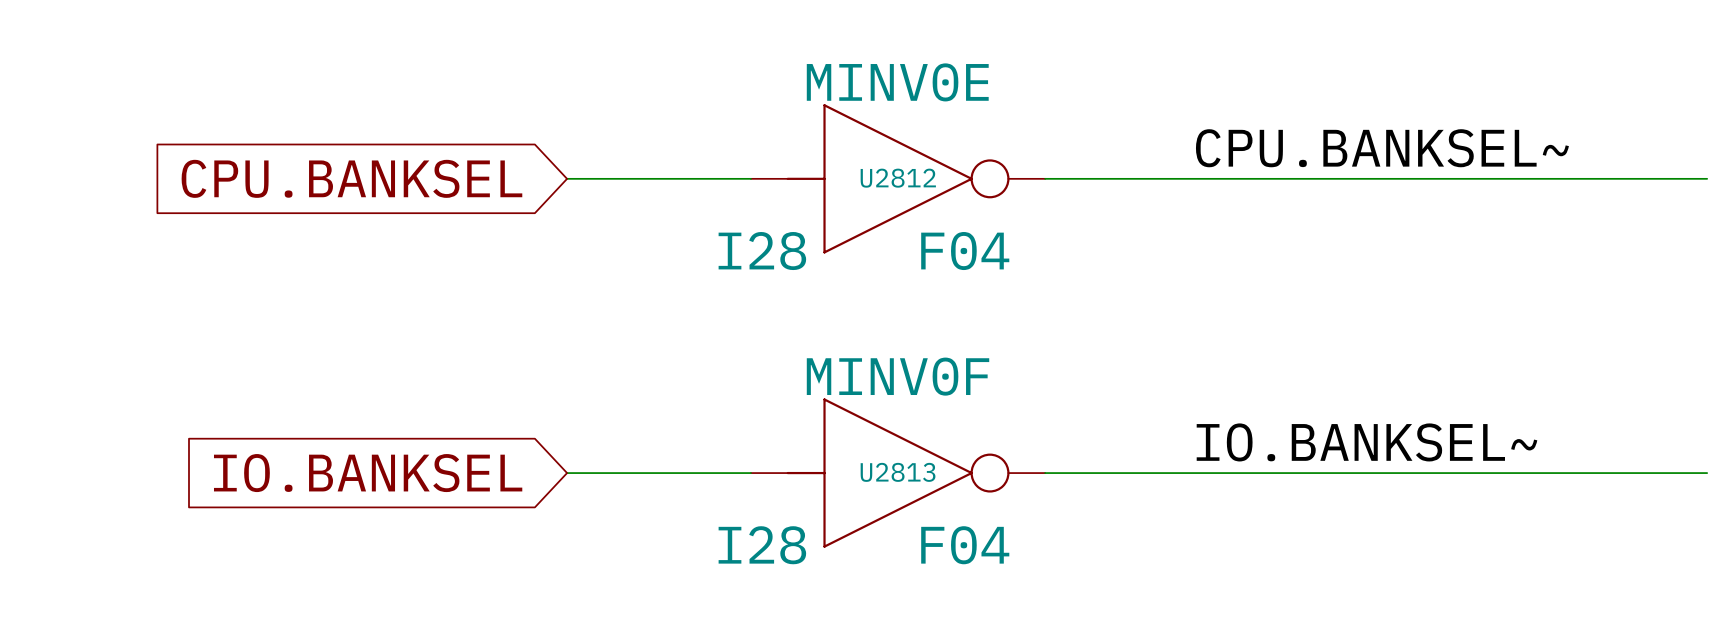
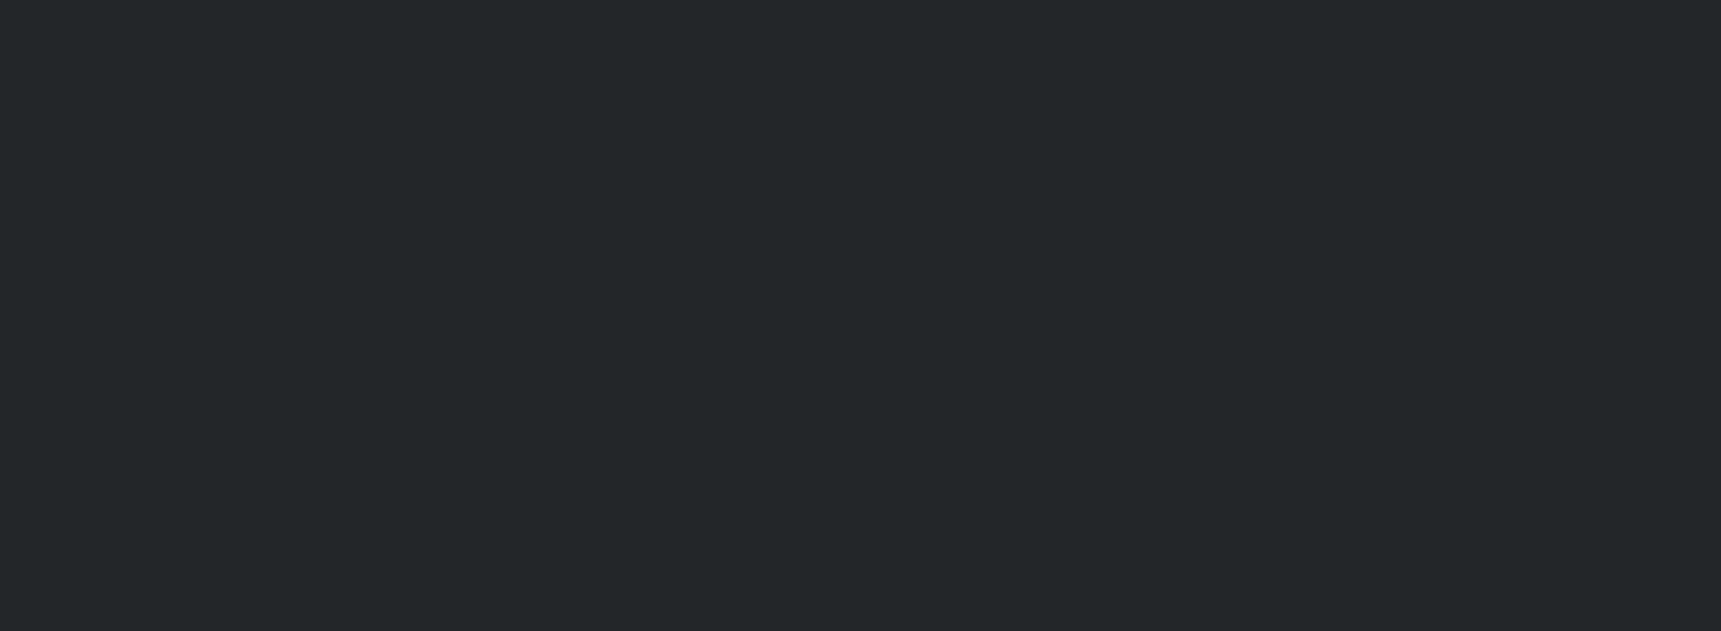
label: CPU.BANKSEL~ (1382, 148) -> none
global label: CPU.BANKSEL (351, 178) -> none
wire: (567, 178) (750, 178) -> none
U2812: F04 (898, 178) -> none
wire: (1045, 178) (1707, 178) -> none
label: IO.BANKSEL~ (1367, 442) -> none
global label: IO.BANKSEL (368, 473) -> none
wire: (567, 473) (750, 473) -> none
U2813: F04 (898, 473) -> none
wire: (1045, 473) (1707, 473) -> none

